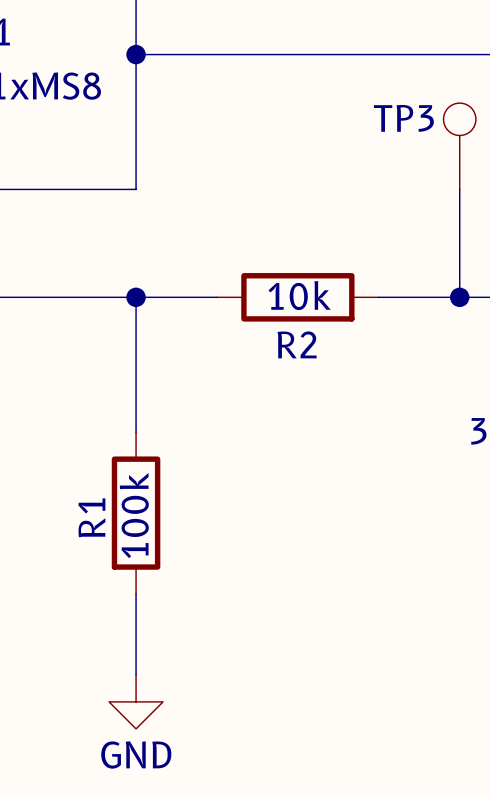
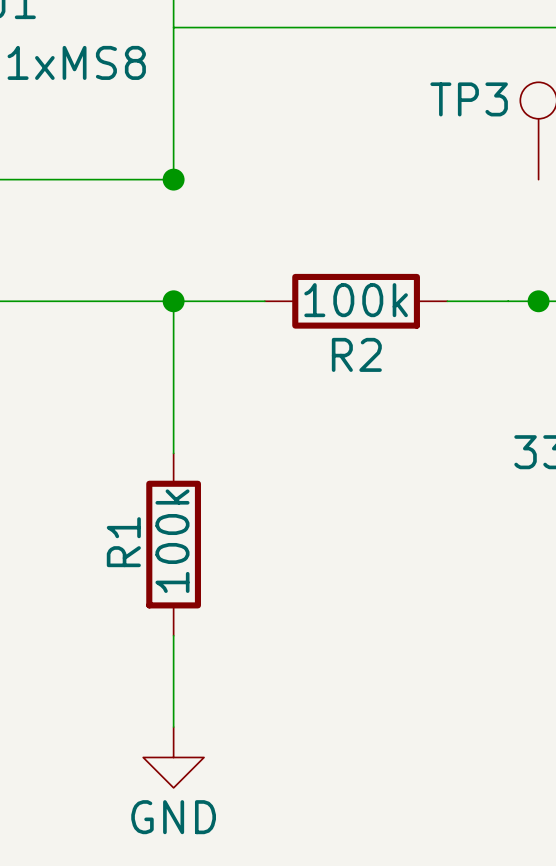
junction: (136, 54) -> none
junction: none -> (173, 179)
wire: (459, 189) (459, 297) -> none
R2 value: 10k (299, 295) -> 100k (356, 300)

